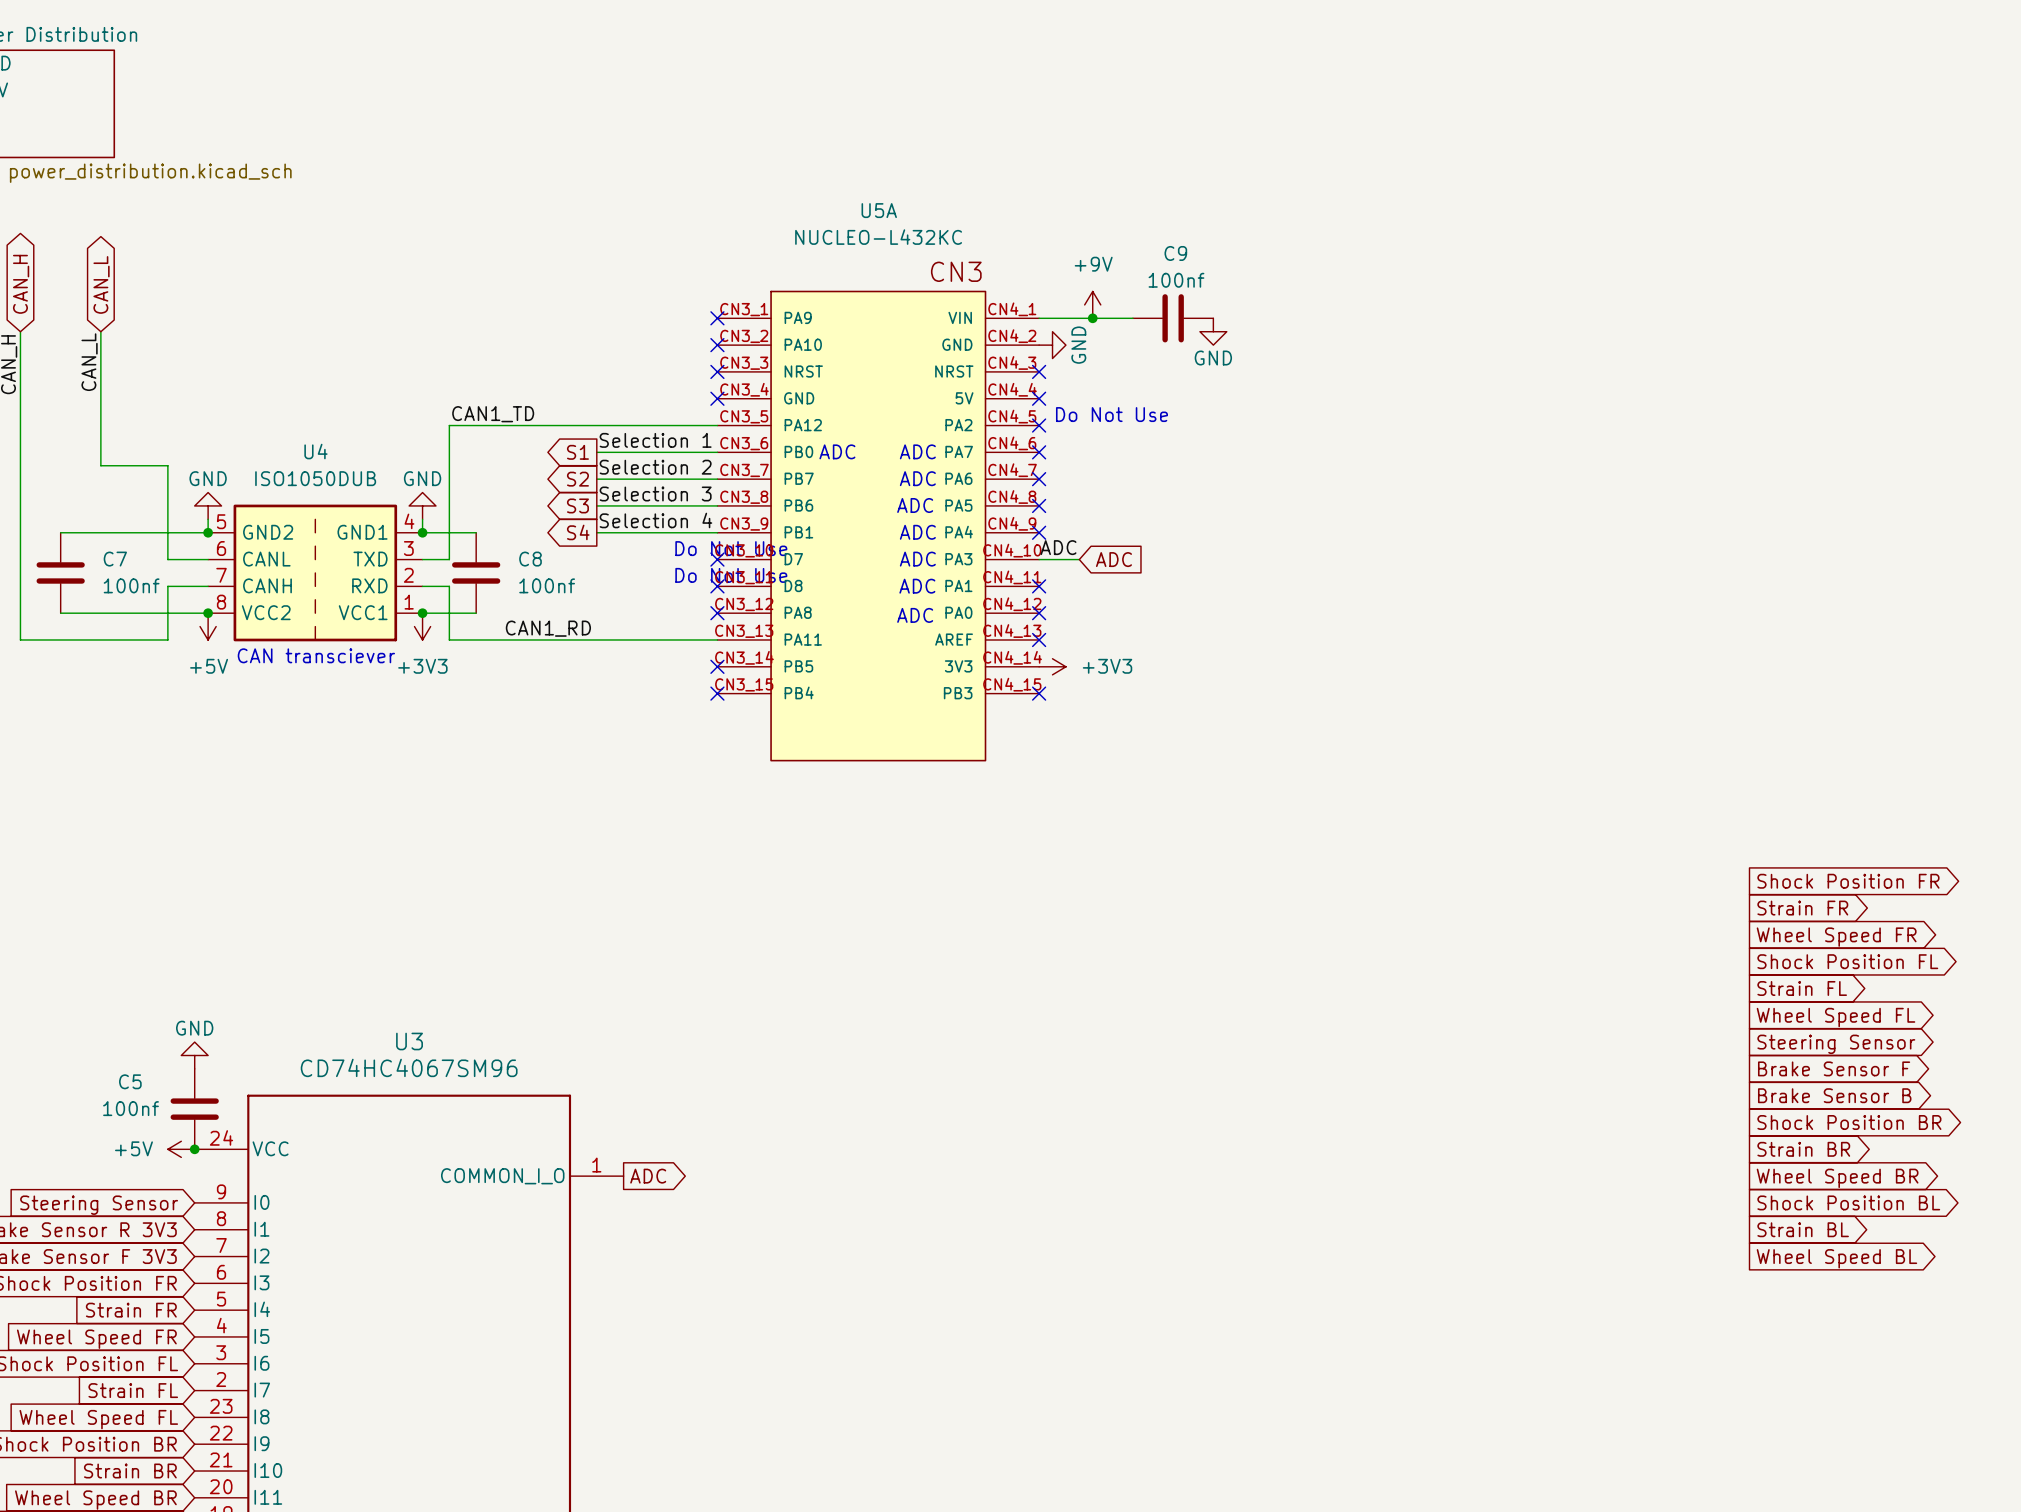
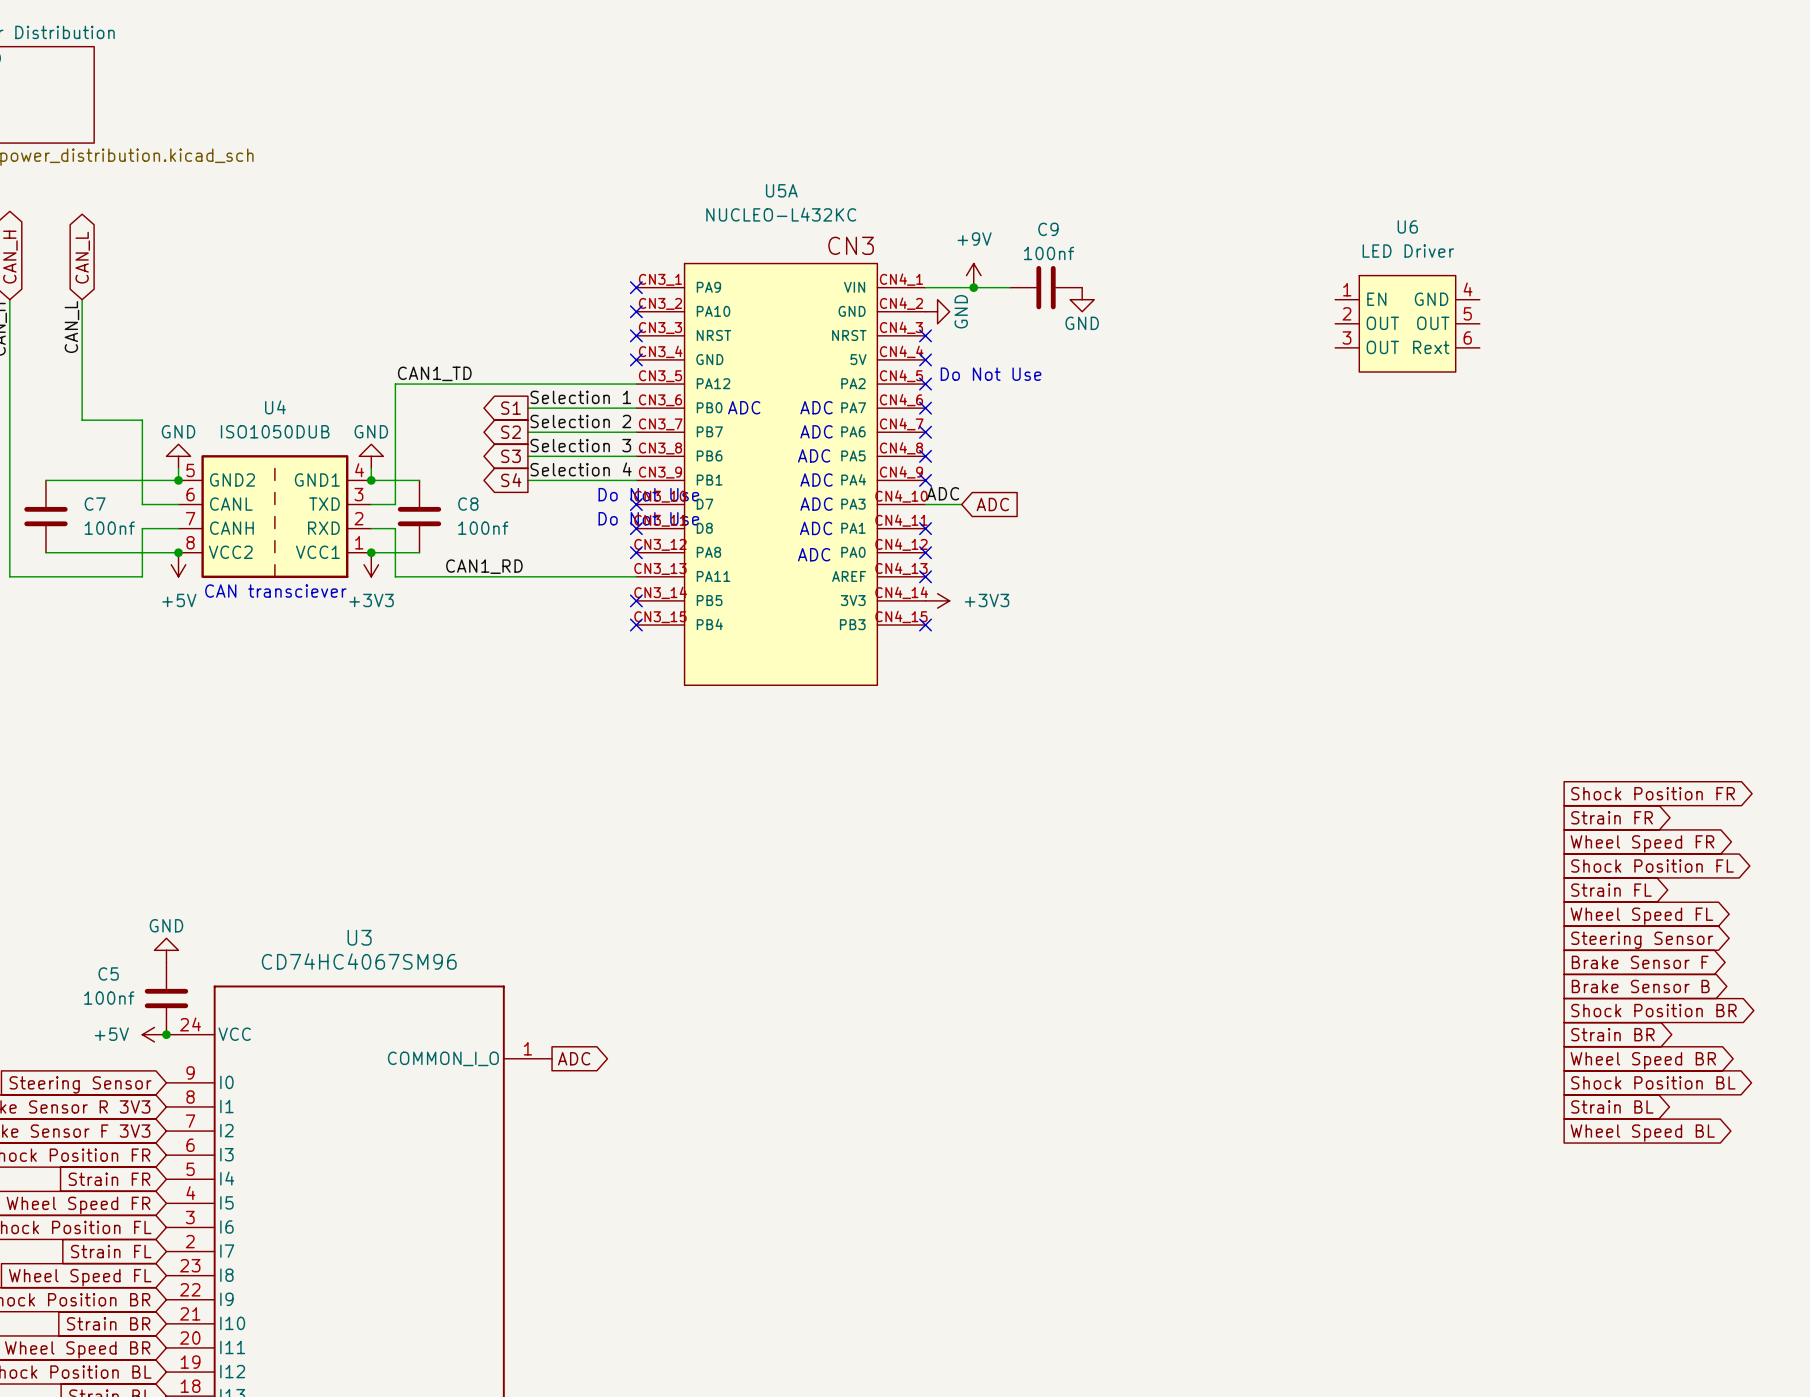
U6: none -> LED Driver (1407, 323)

